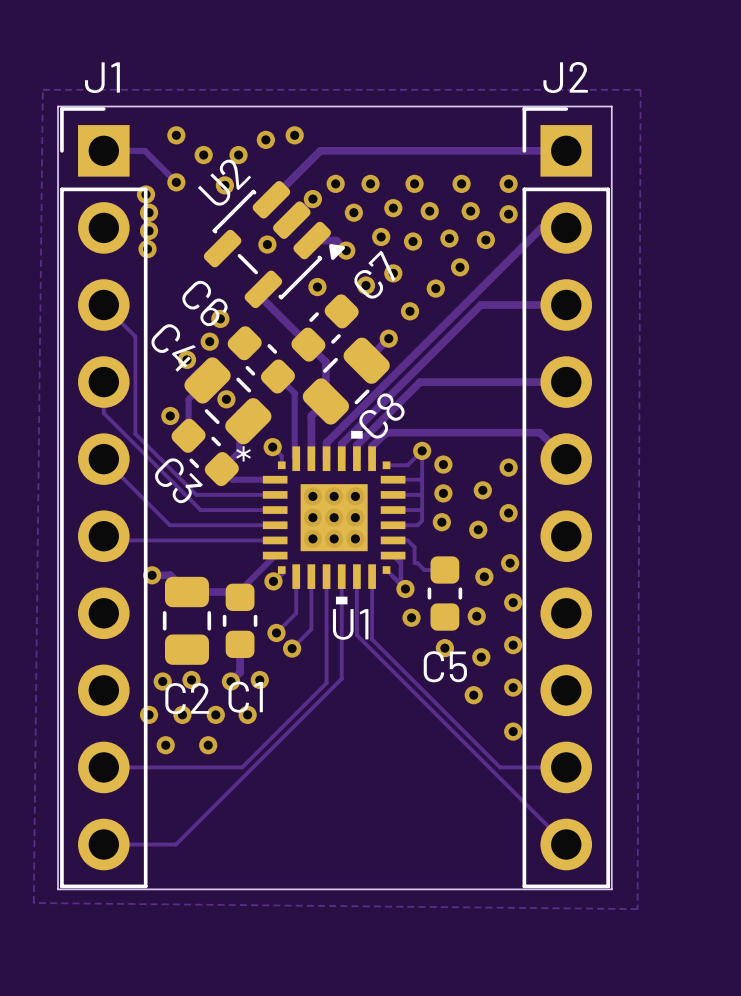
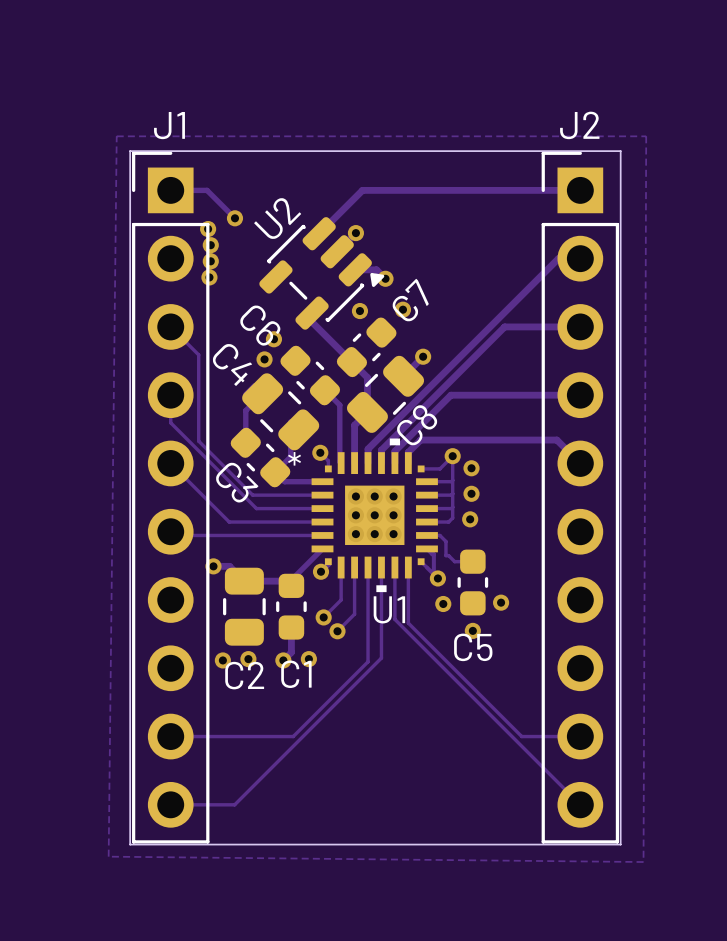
via: (176, 135) -> none
via: (294, 135) -> none
via: (265, 139) -> none
via: (203, 155) -> none
via: (238, 155) -> none
via: (335, 183) -> none
via: (370, 183) -> none
via: (414, 183) -> none
via: (461, 183) -> none
via: (508, 183) -> none
via: (224, 185) -> none
via: (393, 208) -> none
via: (429, 211) -> none
via: (470, 211) -> none
via: (353, 212) -> none
via: (508, 214) -> none
via: (381, 236) -> none
via: (449, 238) -> none
via: (485, 240) -> none
via: (413, 241) -> none
via: (267, 244) -> none
via: (460, 267) -> none
via: (393, 273) -> none
via: (435, 288) -> none
via: (410, 311) -> none
via: (186, 359) -> none
via: (226, 399) -> none
via: (170, 416) -> none
via: (508, 467) -> none
via: (482, 490) -> none
via: (508, 513) -> none
via: (478, 529) -> none
via: (510, 563) -> none
via: (484, 576) -> none
via: (513, 602) -> none
via: (513, 645) -> none
via: (481, 657) -> none
via: (513, 687) -> none
via: (473, 695) -> none
via: (149, 714) -> none
via: (182, 714) -> none
via: (215, 714) -> none
via: (247, 714) -> none
via: (513, 731) -> none
via: (165, 745) -> none
via: (208, 745) -> none

